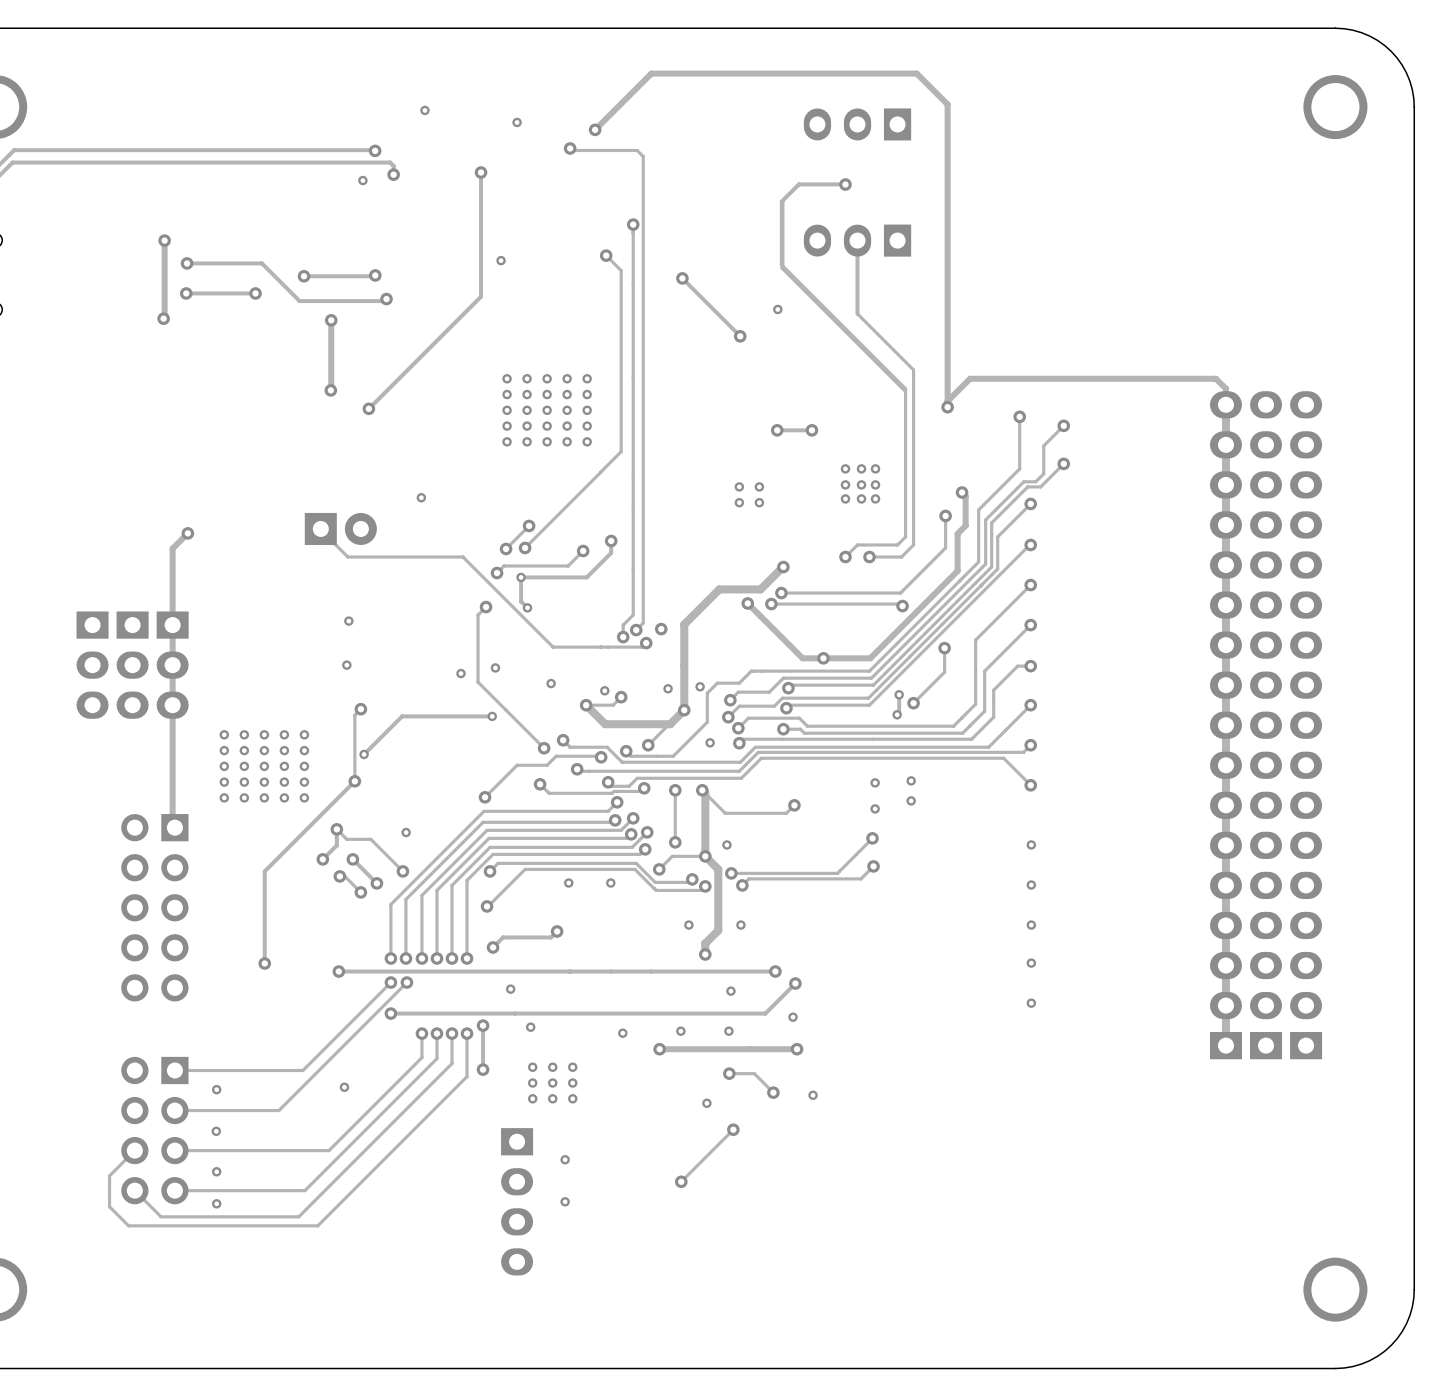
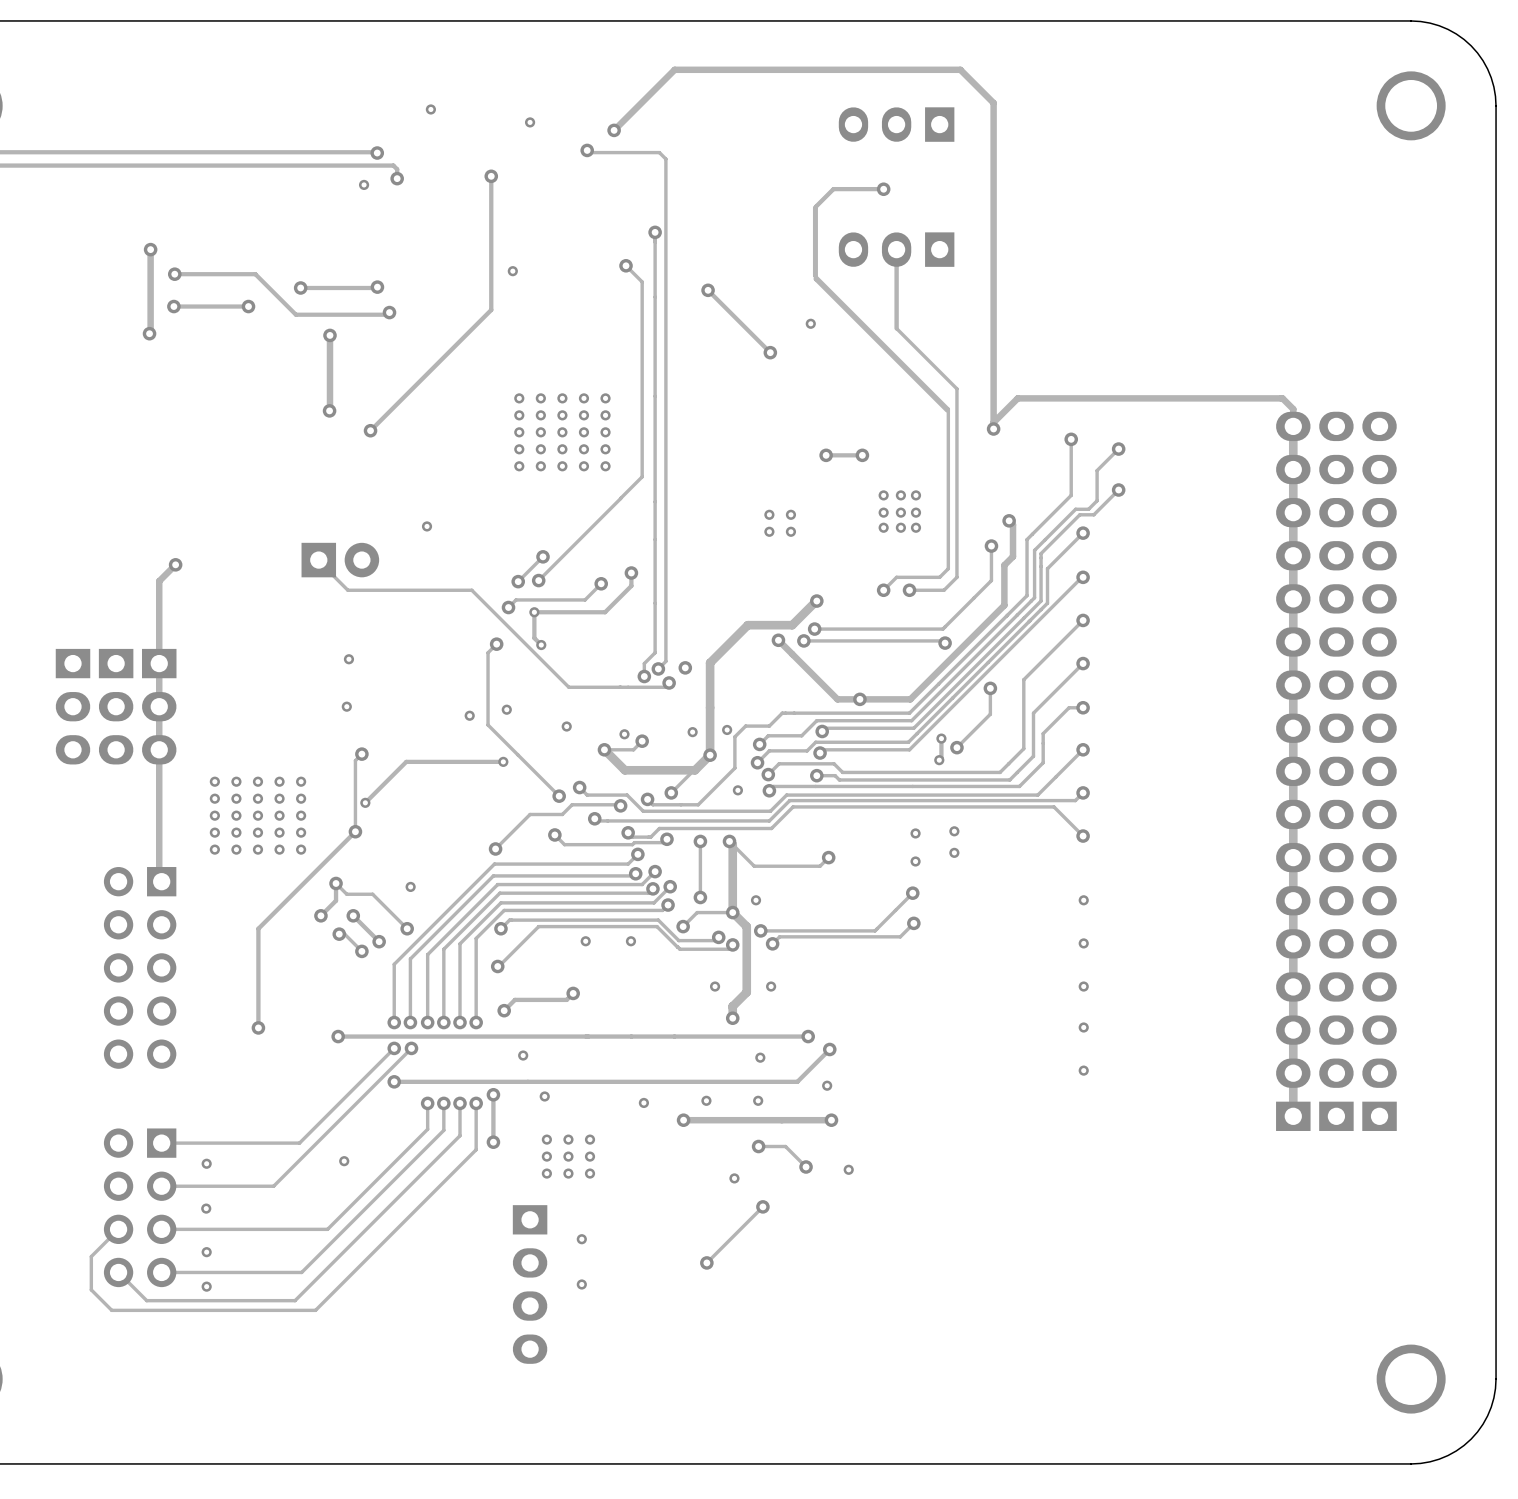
via: (777, 430) -> none
track: (811, 430) (777, 430) -> none
via: (811, 430) -> none
via: none -> (826, 455)
track: none -> (862, 455) (826, 455)
via: none -> (862, 455)

